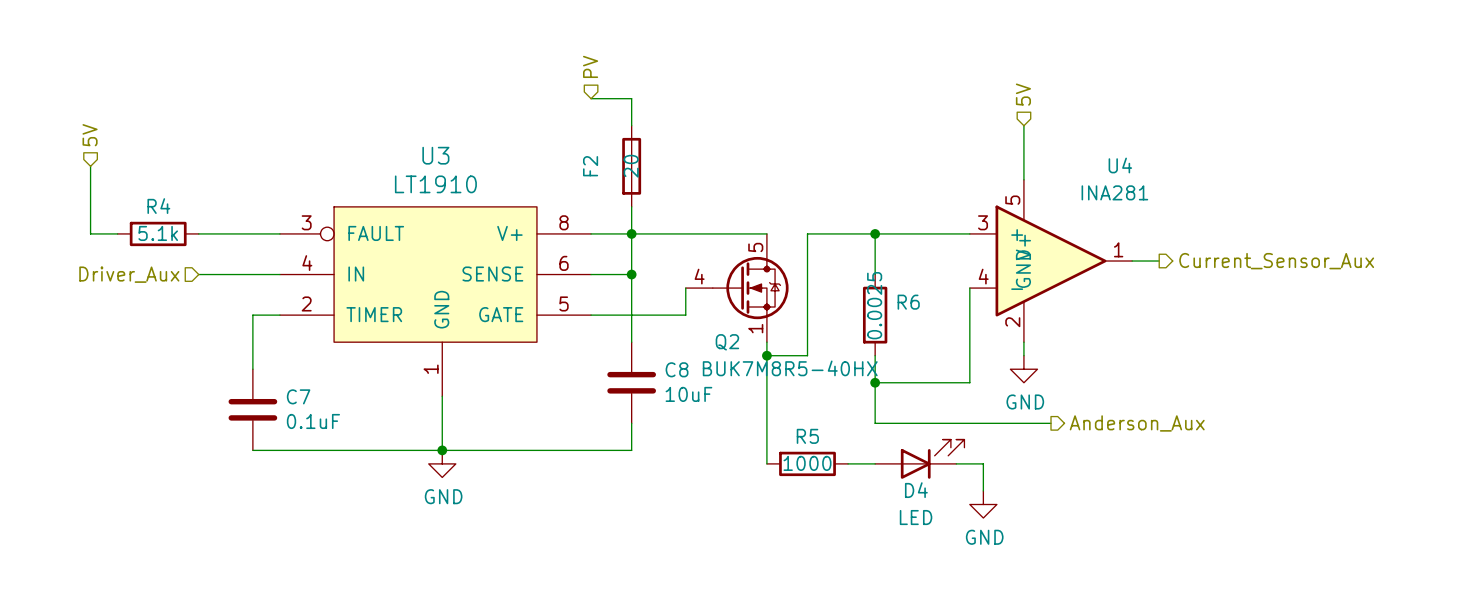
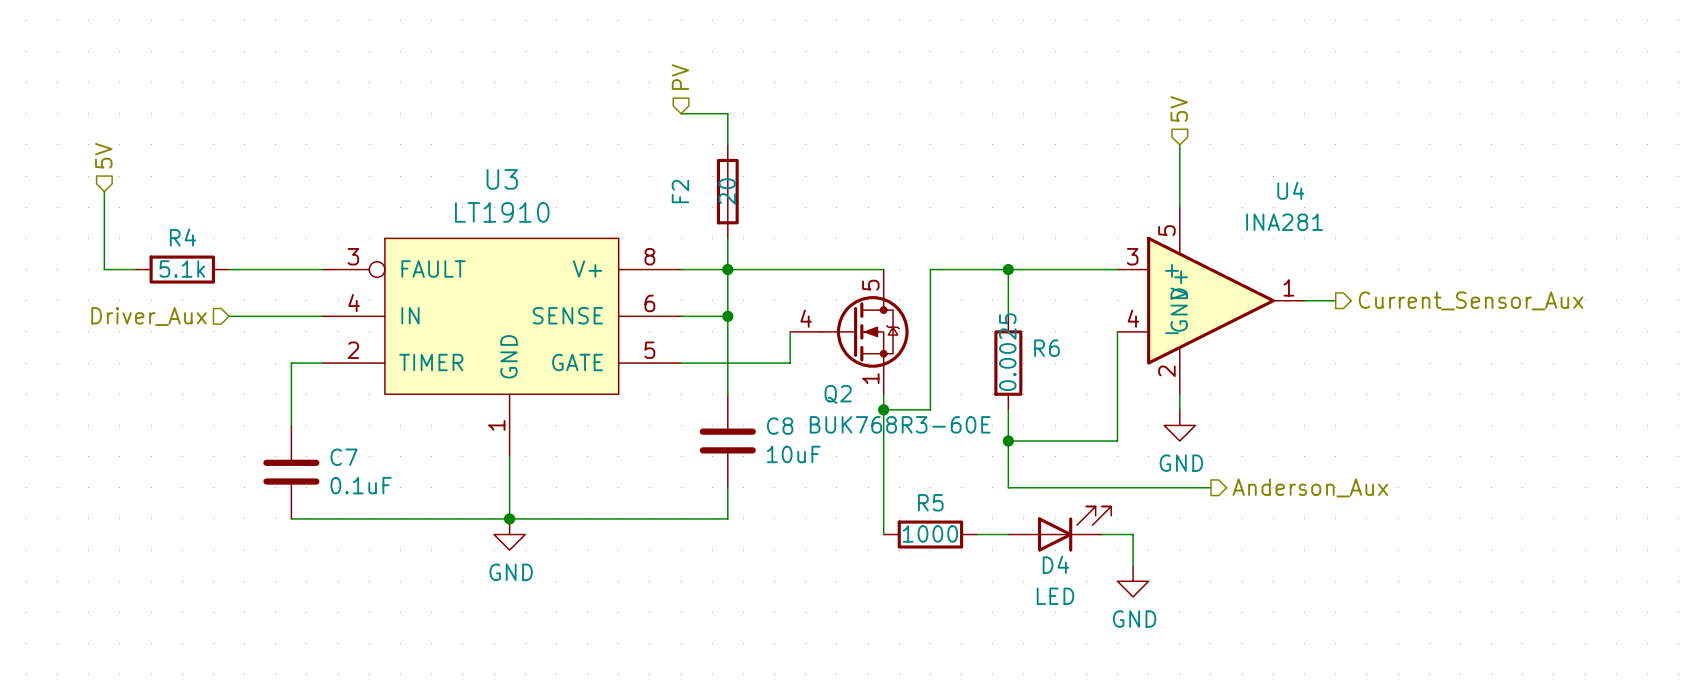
Q2 value: BUK7M8R5-40HX (790, 368) -> BUK768R3-60E (900, 424)

